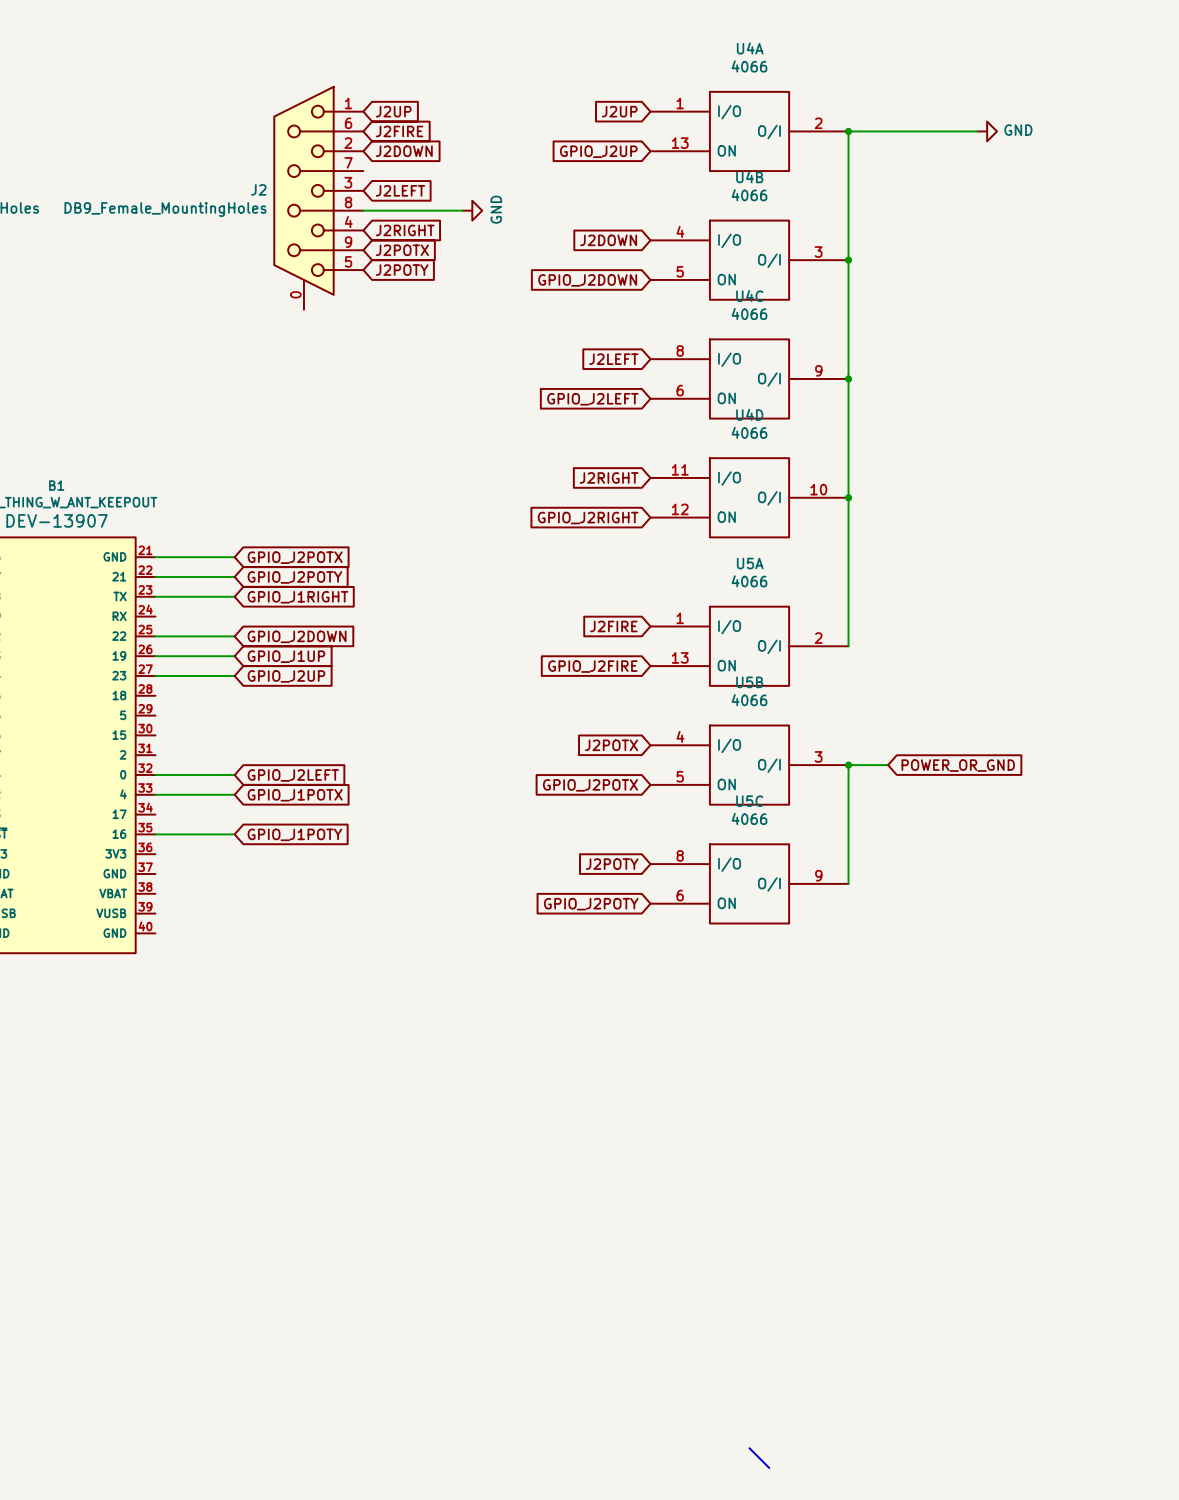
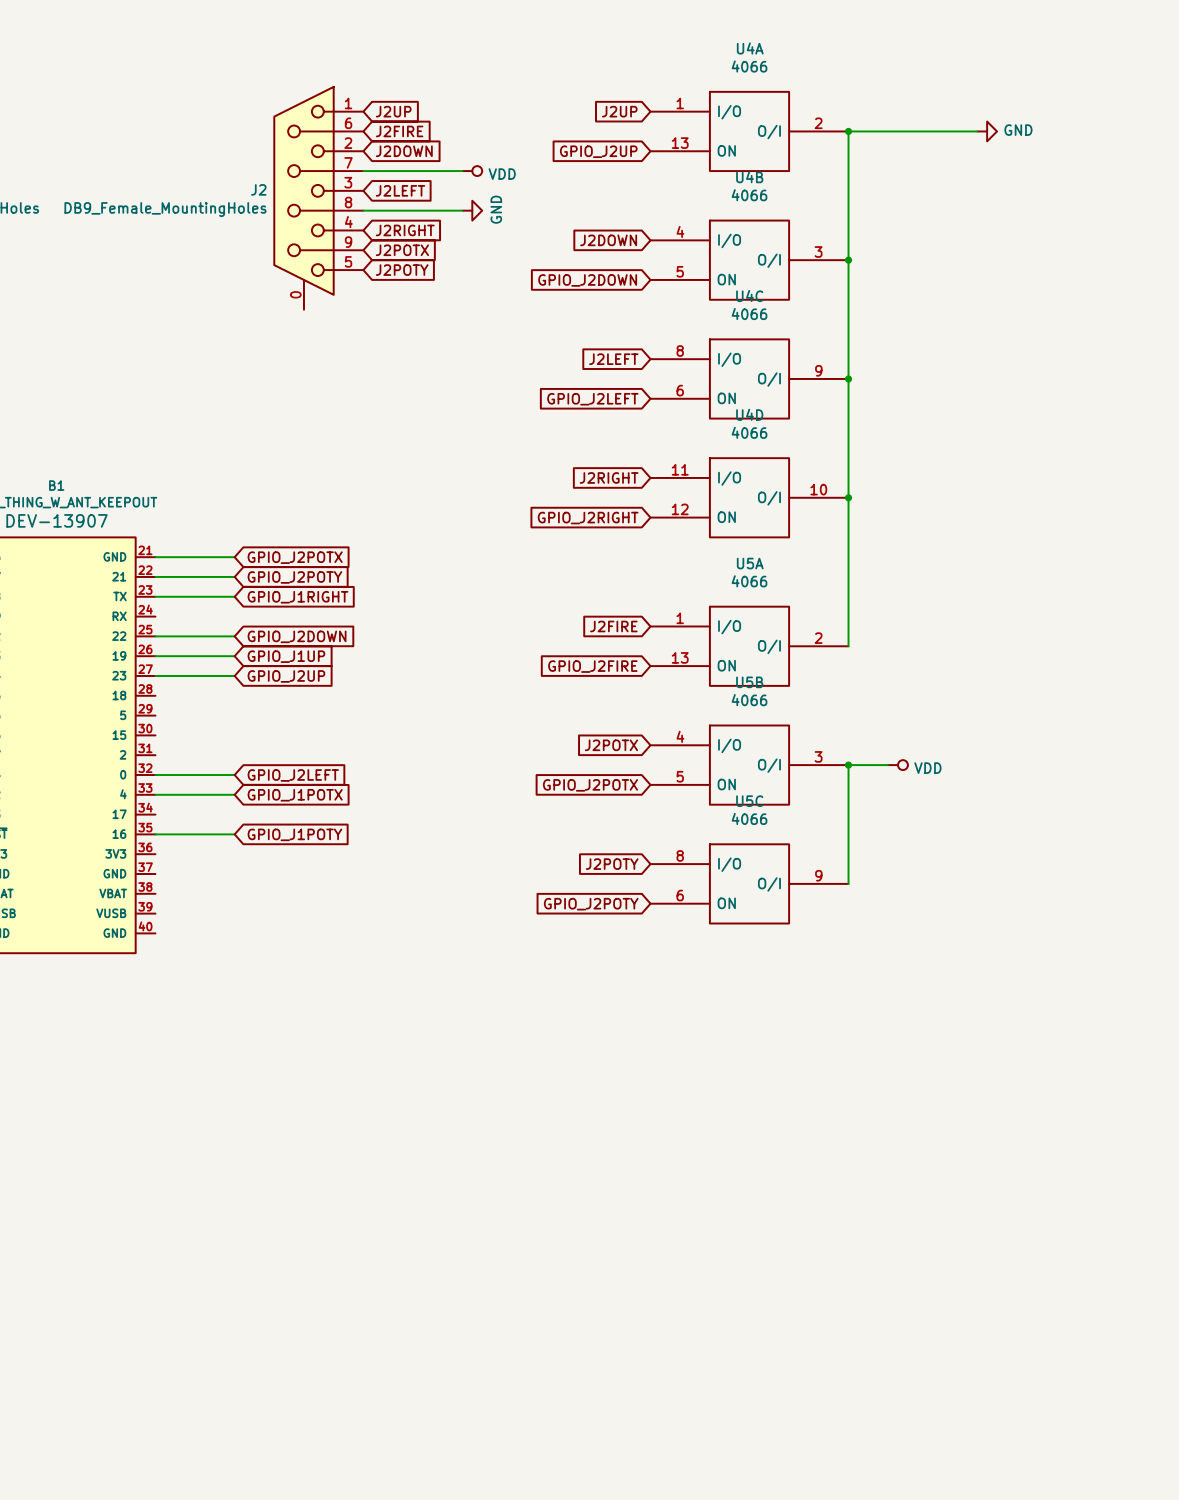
wire: none -> (363, 171) (462, 171)
power symbol: none -> VDD (472, 171)
power symbol: none -> VDD (898, 765)
global label: POWER_OR_GND (958, 765) -> none
bus: (749, 1448) (769, 1468) -> none

